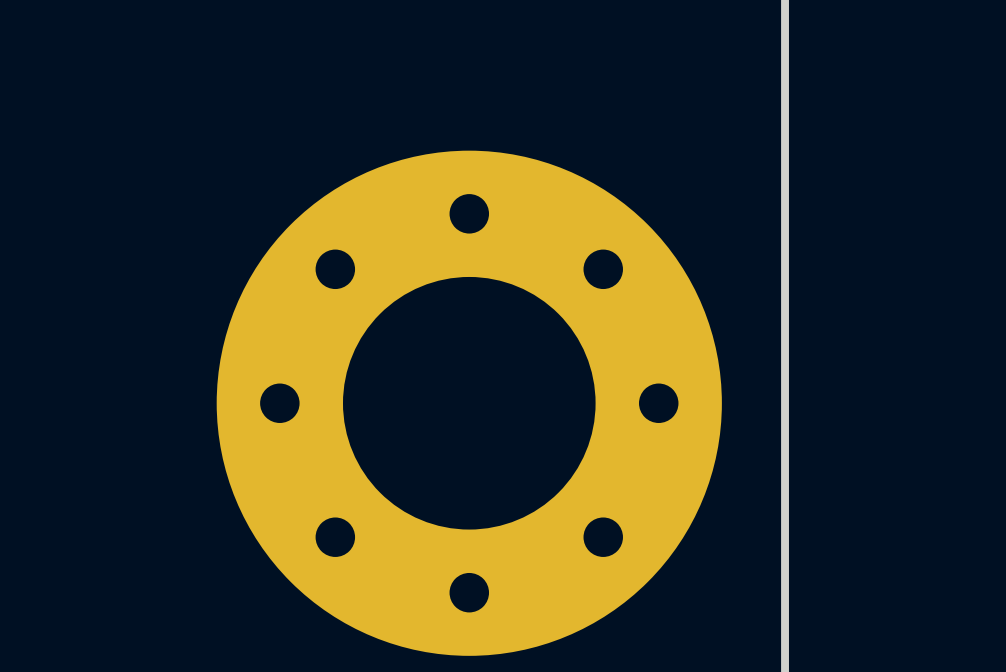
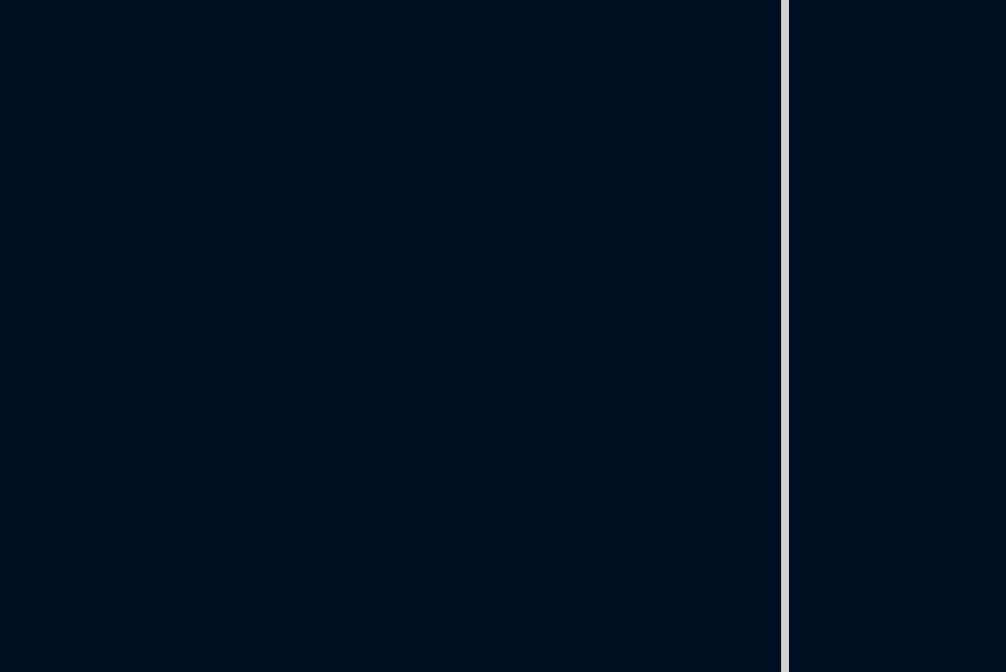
part: (469, 403) -> none

